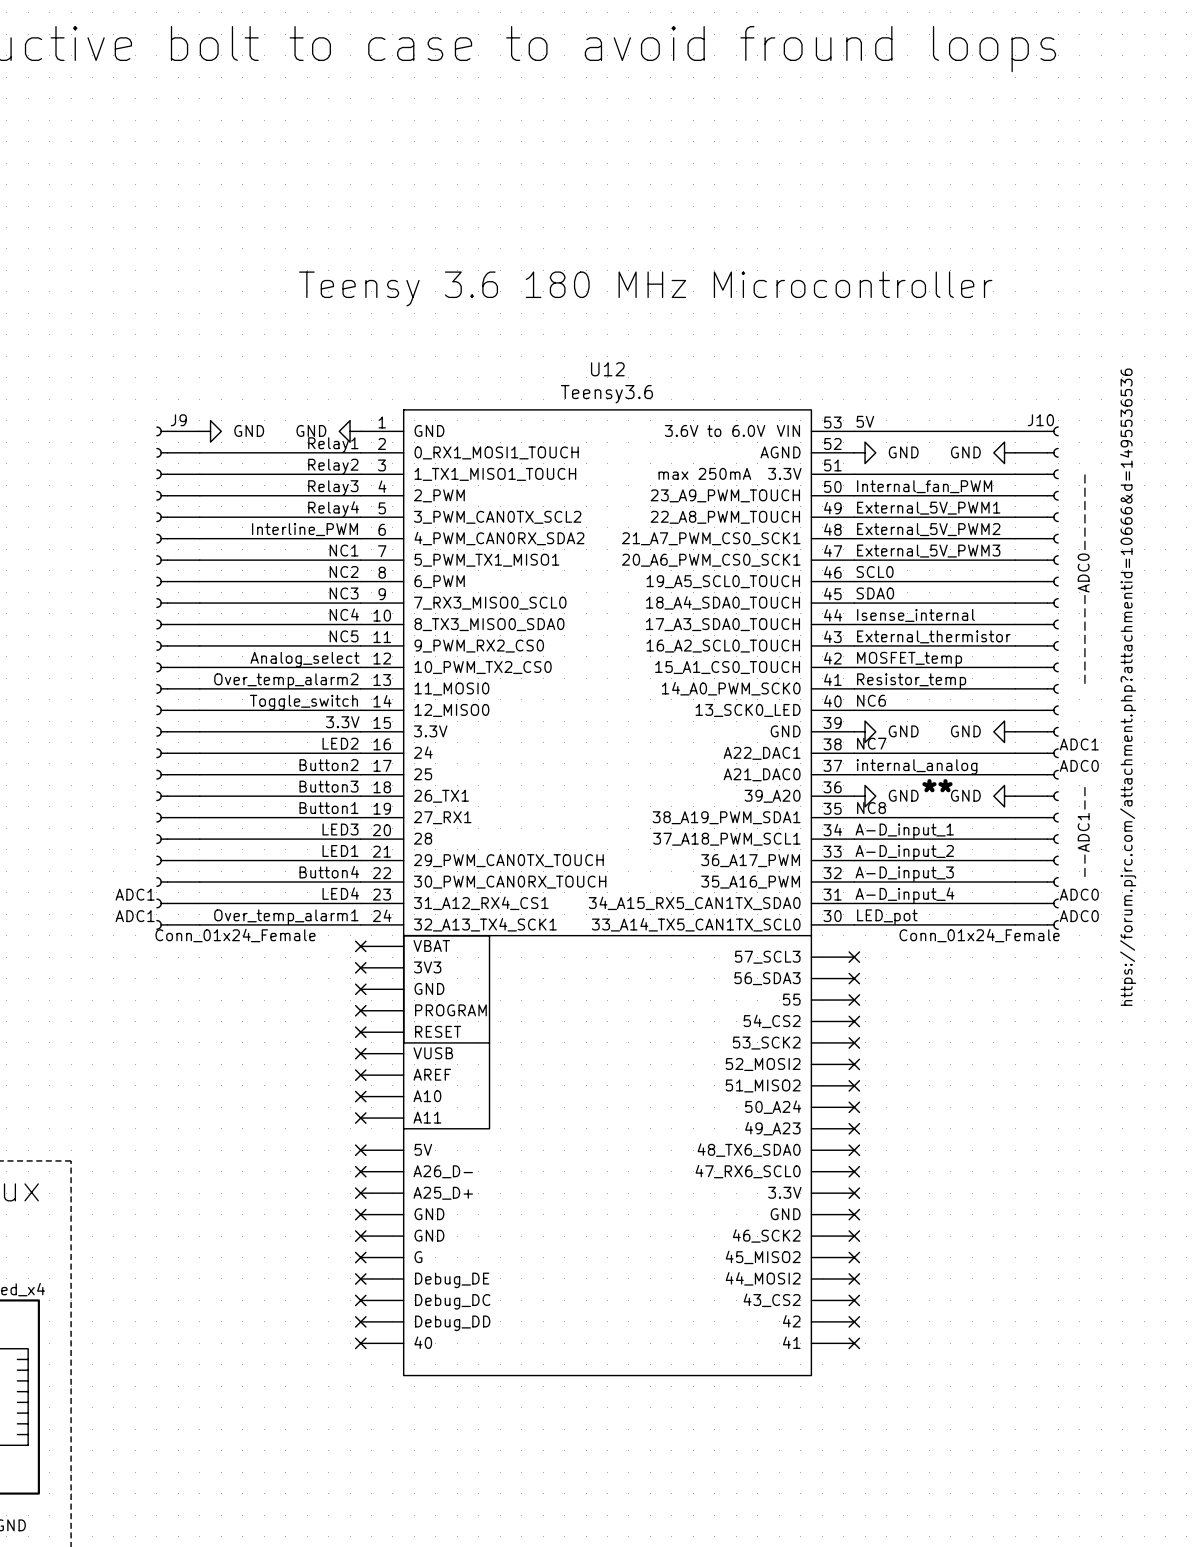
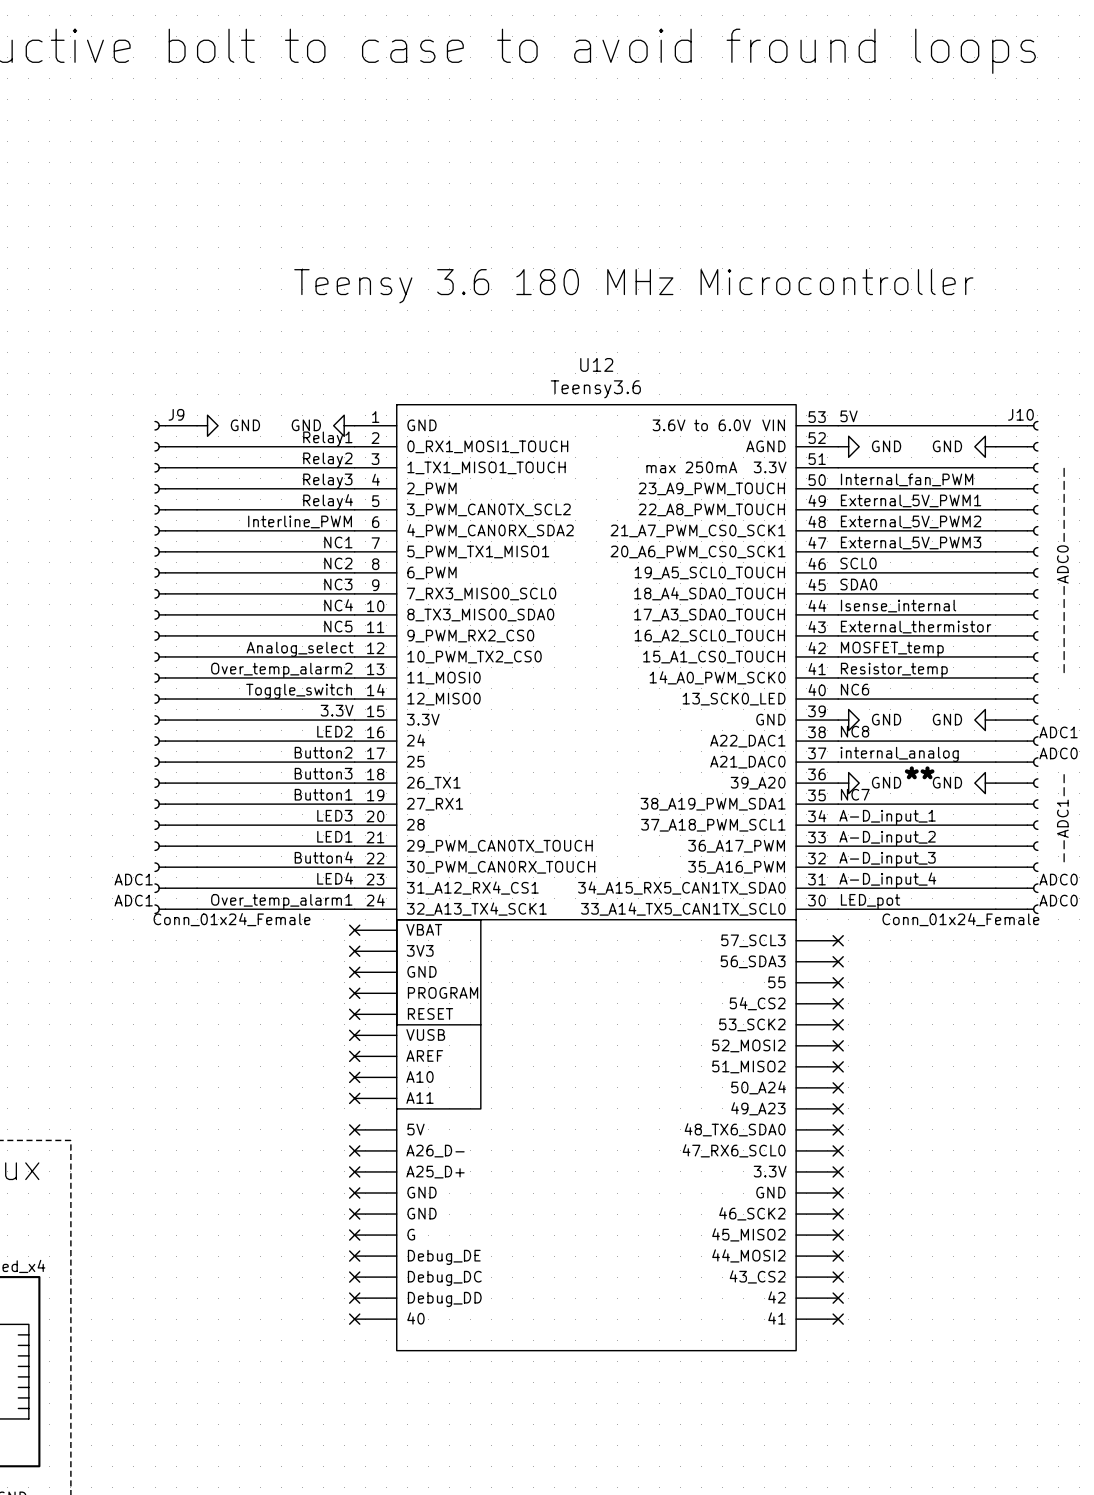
label: NC7 (871, 743) -> NC8 (855, 731)
label: NC8 (871, 808) -> NC7 (855, 794)

